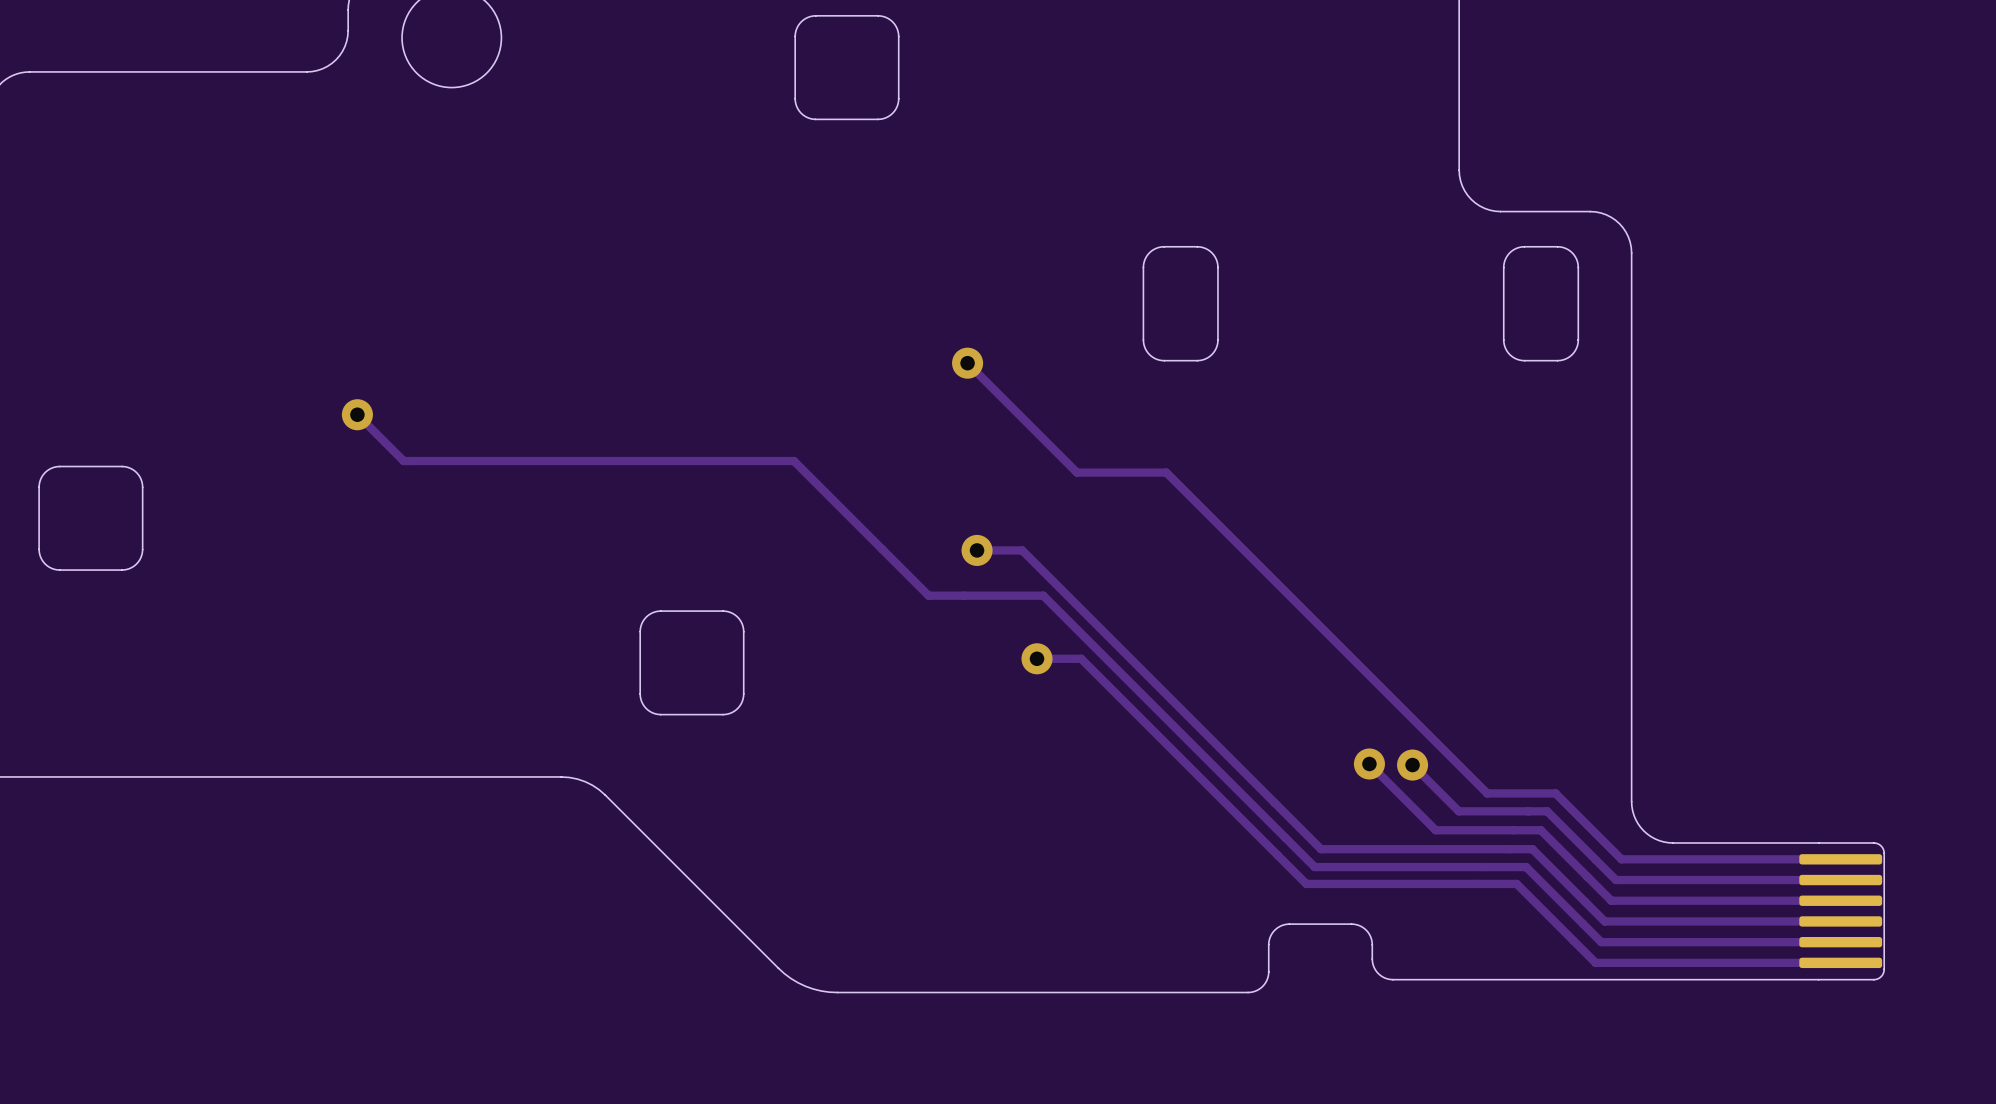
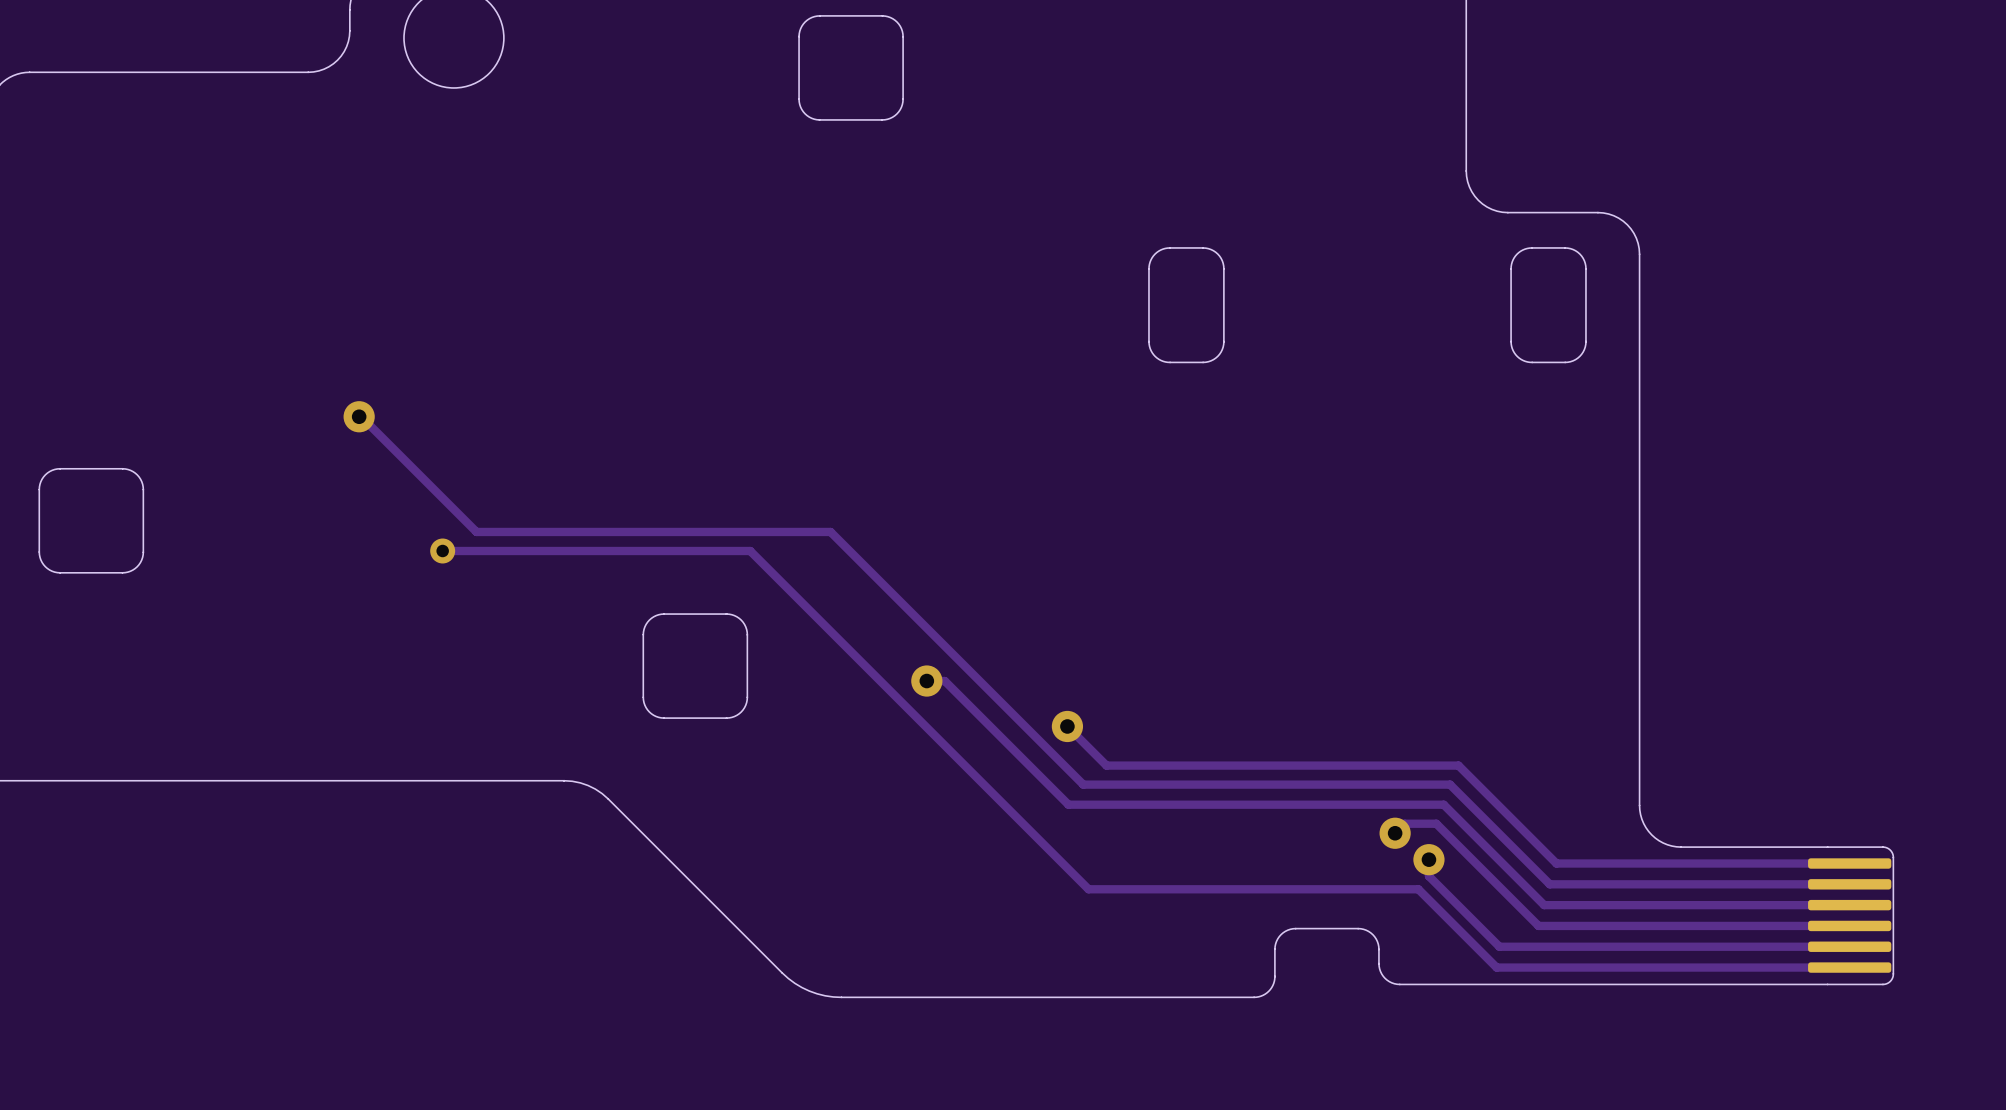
track: (967, 363) (1076, 472) (1166, 472) (1487, 793) (1555, 793) (1621, 859) -> (1067, 726) (1106, 765) (1458, 765) (1556, 863) (1629, 863)
via: (967, 363) -> none
track: (357, 414) (403, 461) (793, 461) (928, 595) (1043, 595) (1314, 867) (1526, 867) (1601, 942) -> (359, 416) (476, 531) (830, 531) (1083, 784) (1450, 784) (1549, 884) (1623, 884)
via: none -> (442, 551)
track: (977, 550) (1022, 550) (1321, 849) (1532, 849) (1604, 921) -> (1395, 833) (1404, 823) (1436, 823) (1538, 925) (1612, 925)
via: (977, 550) -> none
track: (1037, 658) (1081, 658) (1306, 883) (1516, 883) (1595, 962) -> (442, 551) (750, 551) (1088, 889) (1418, 889) (1496, 967) (1603, 967)
via: (1037, 658) -> none
via: none -> (926, 681)
via: none -> (1067, 726)
track: (1369, 763) (1435, 830) (1540, 830) (1611, 900) -> (926, 681) (944, 681) (1068, 804) (1443, 804) (1544, 905) (1619, 905)
via: (1369, 763) -> none
track: (1412, 765) (1458, 811) (1547, 811) (1615, 880) -> none
via: (1412, 765) -> none
via: none -> (1395, 833)
track: none -> (1428, 859) (1428, 876) (1499, 946) (1609, 946)
via: none -> (1428, 859)

